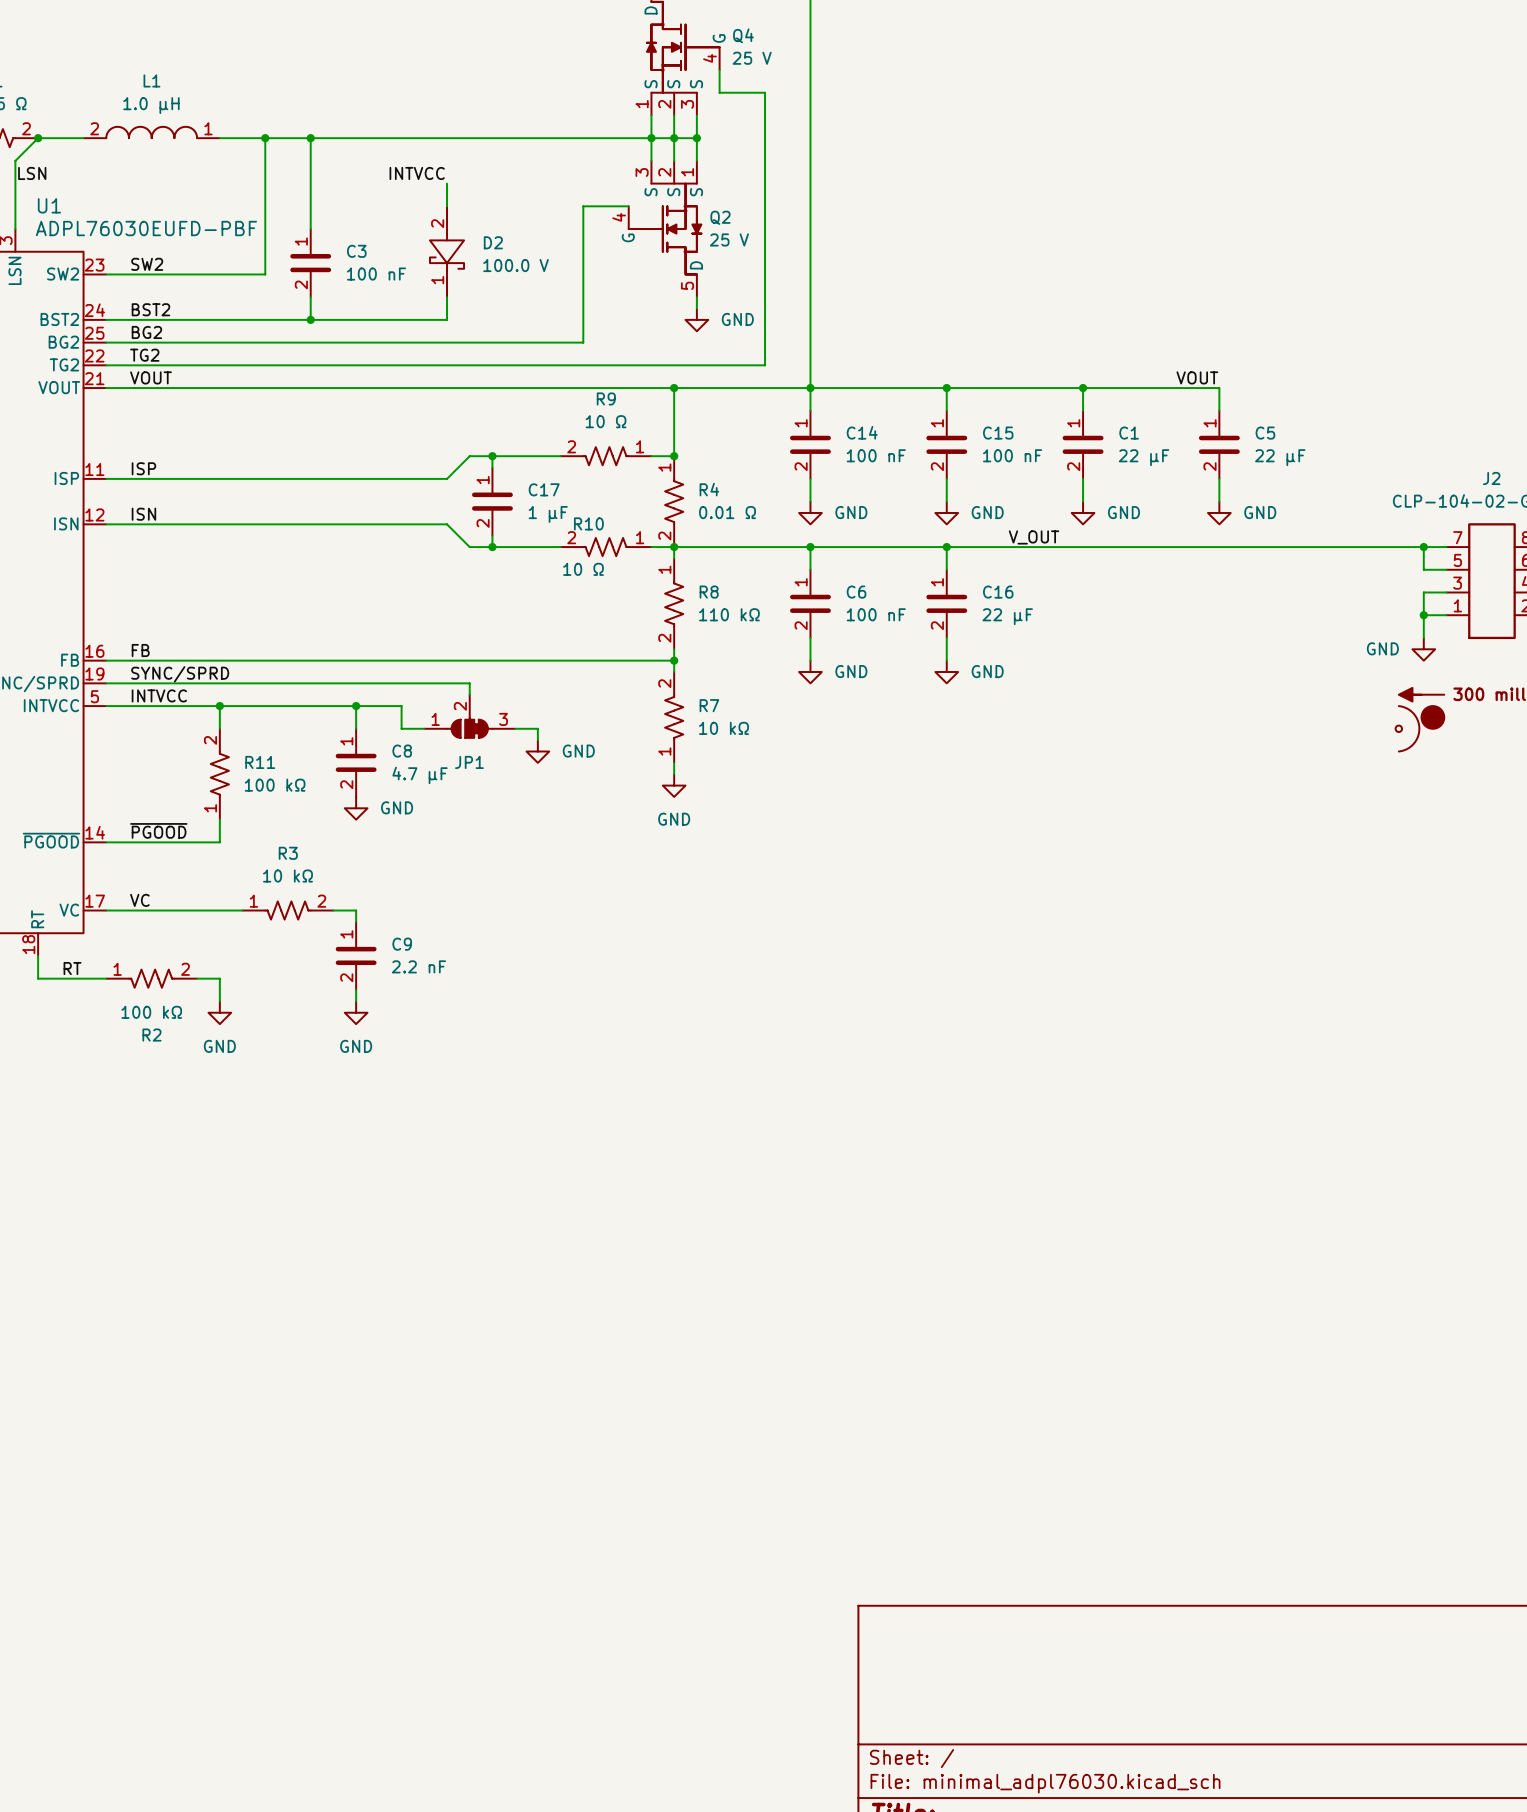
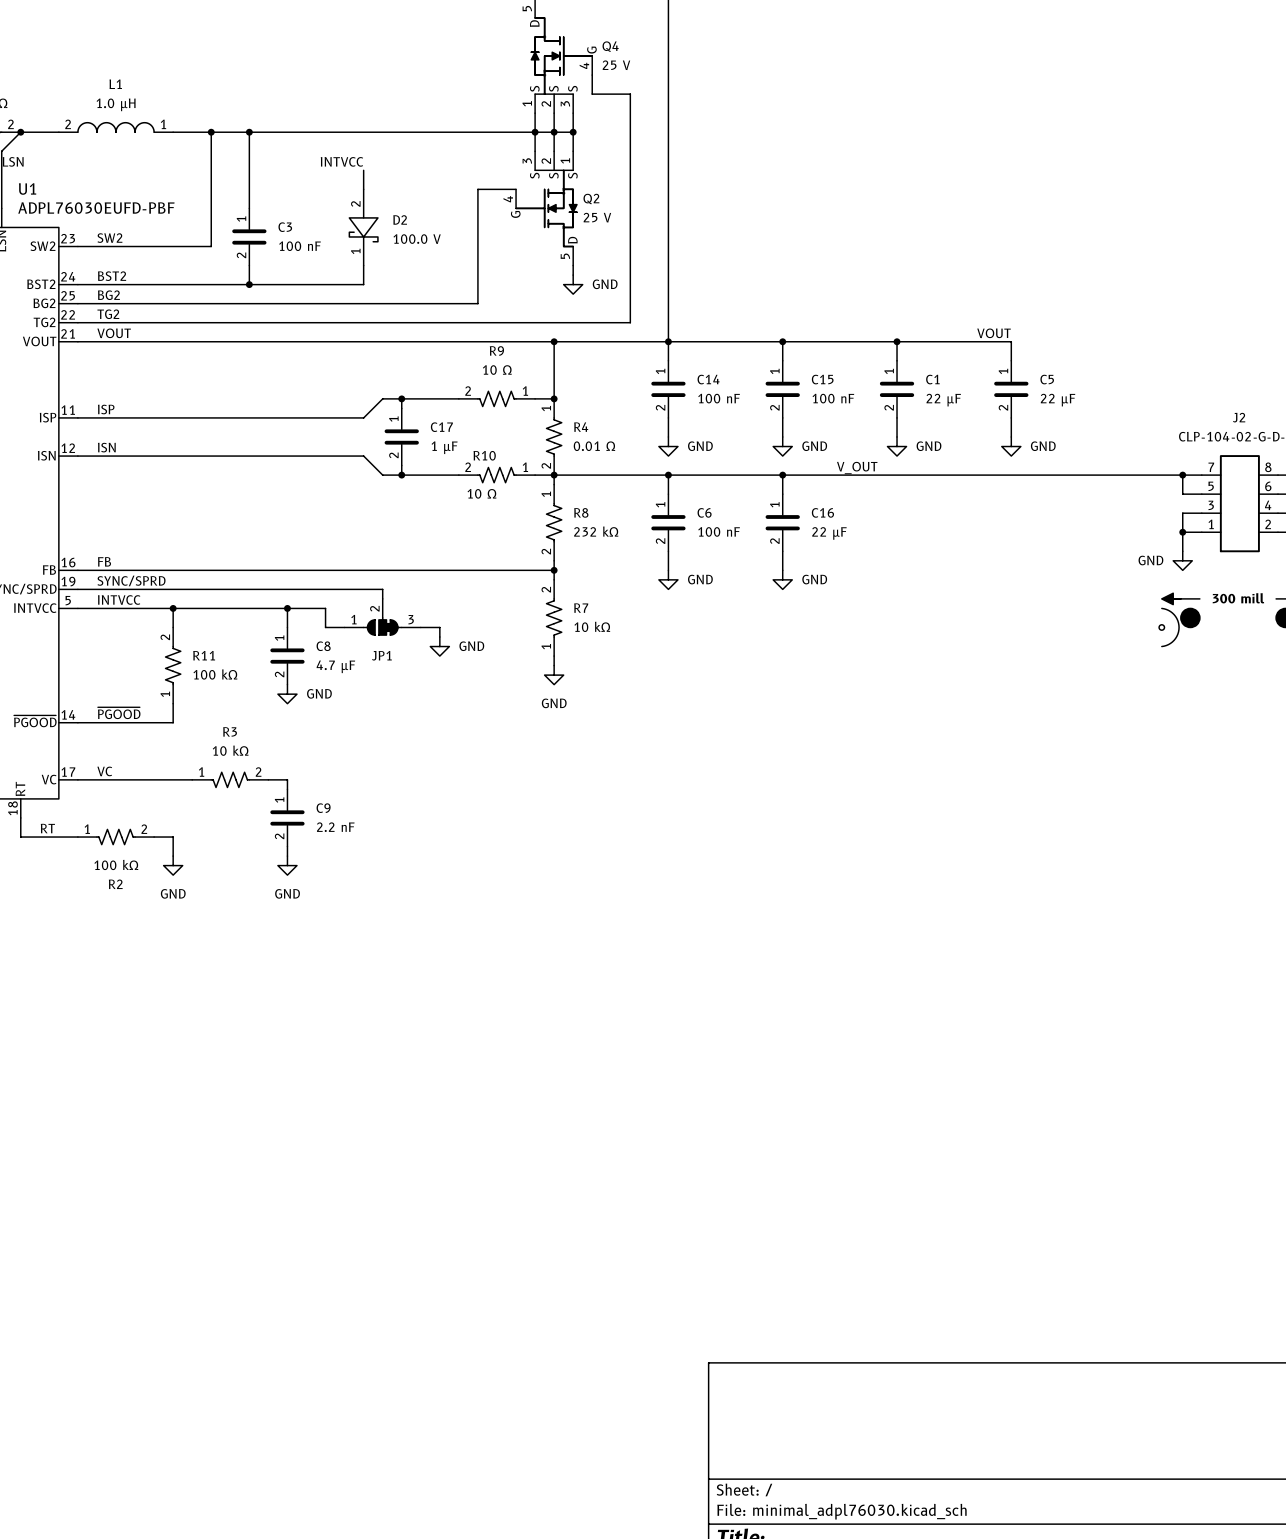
R8 value: 110 kΩ (729, 614) -> 232 kΩ (596, 531)

